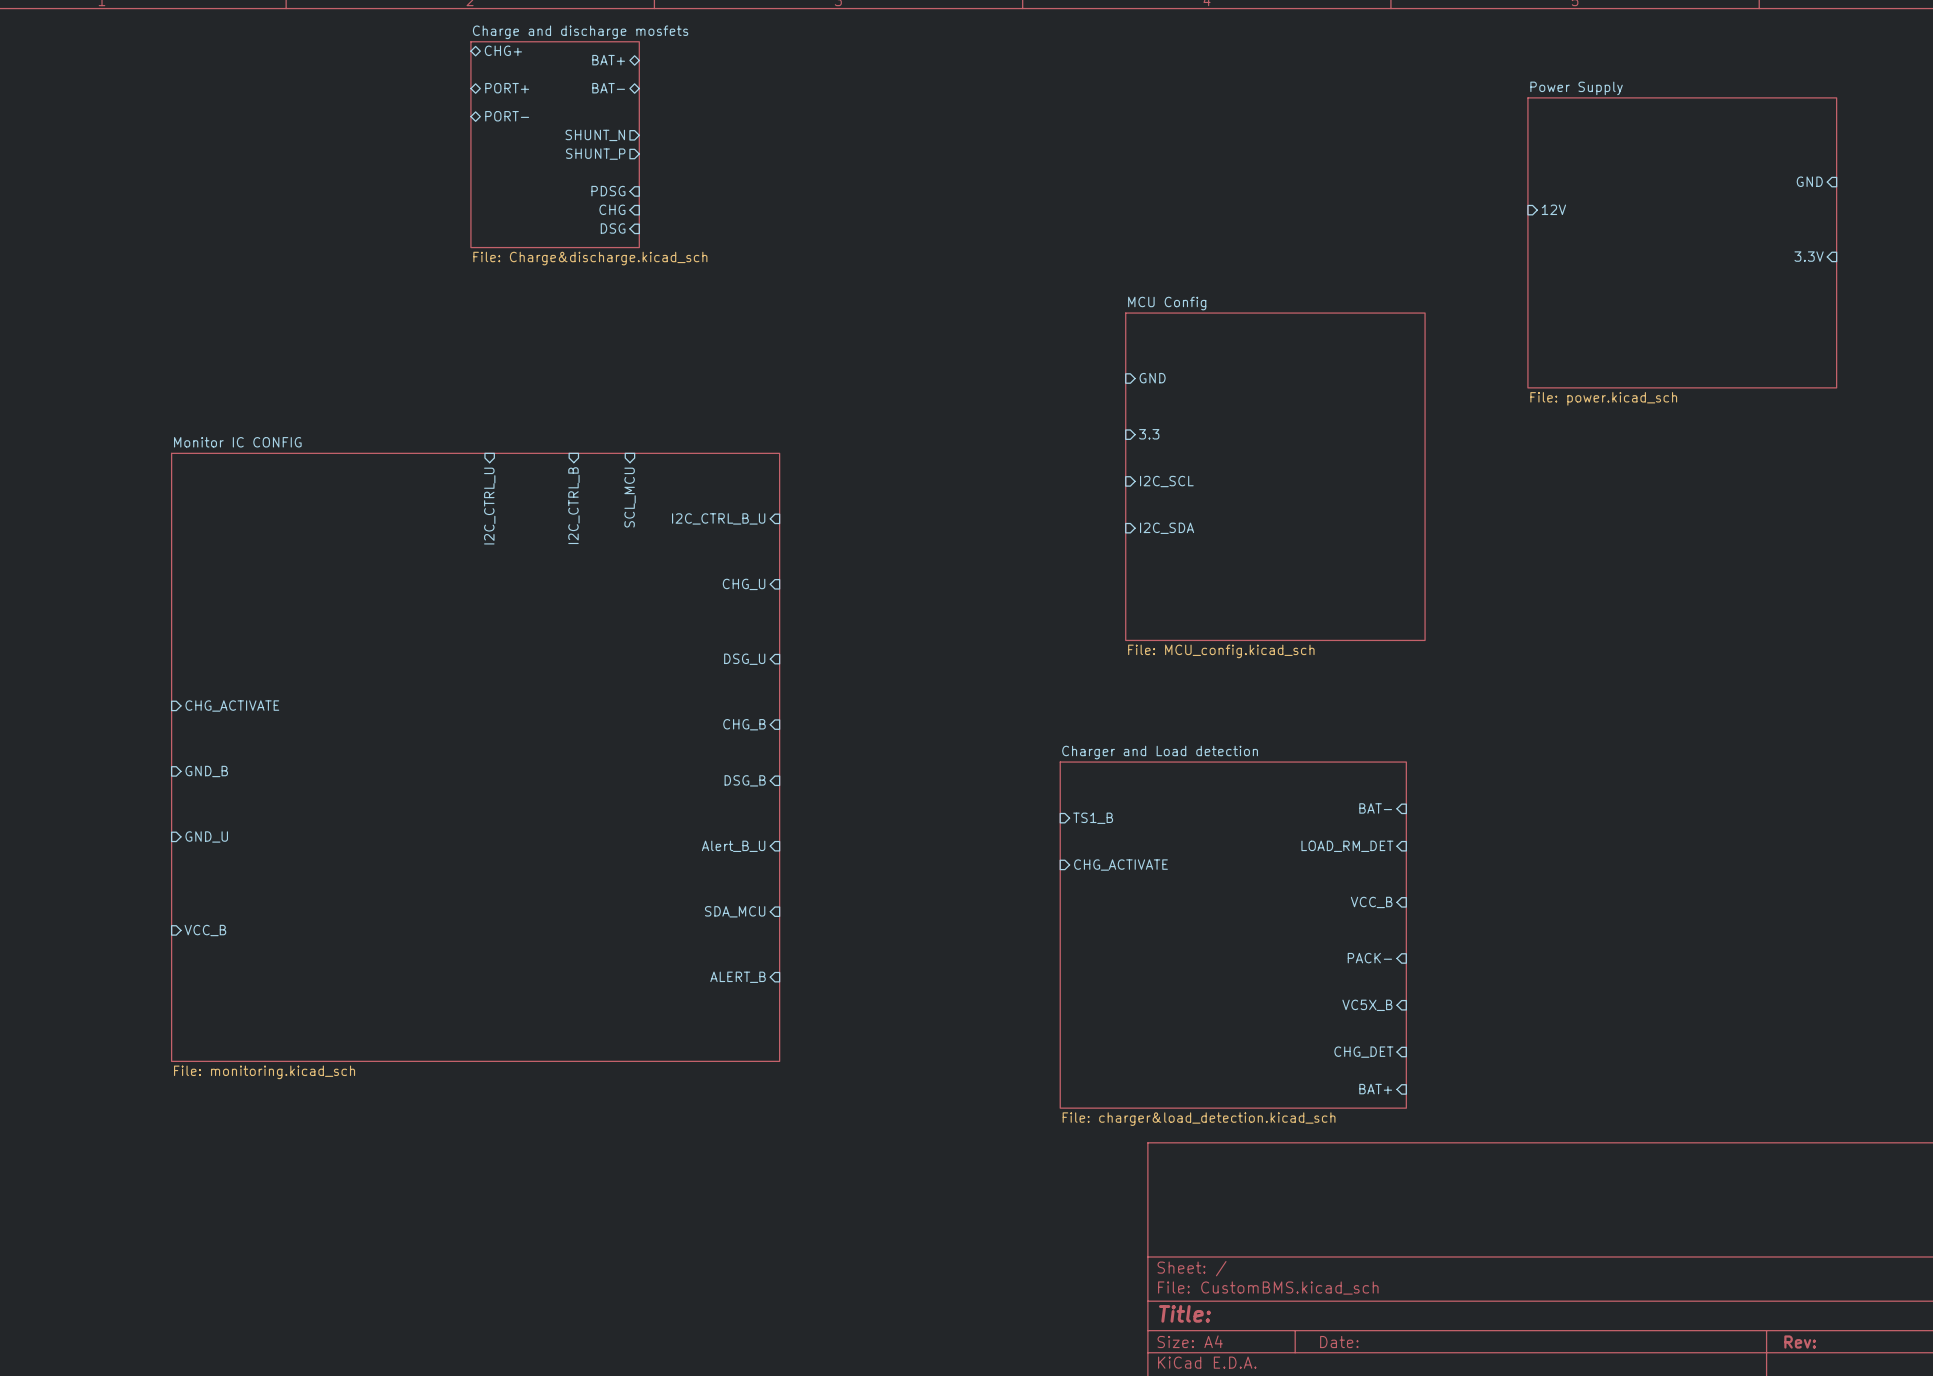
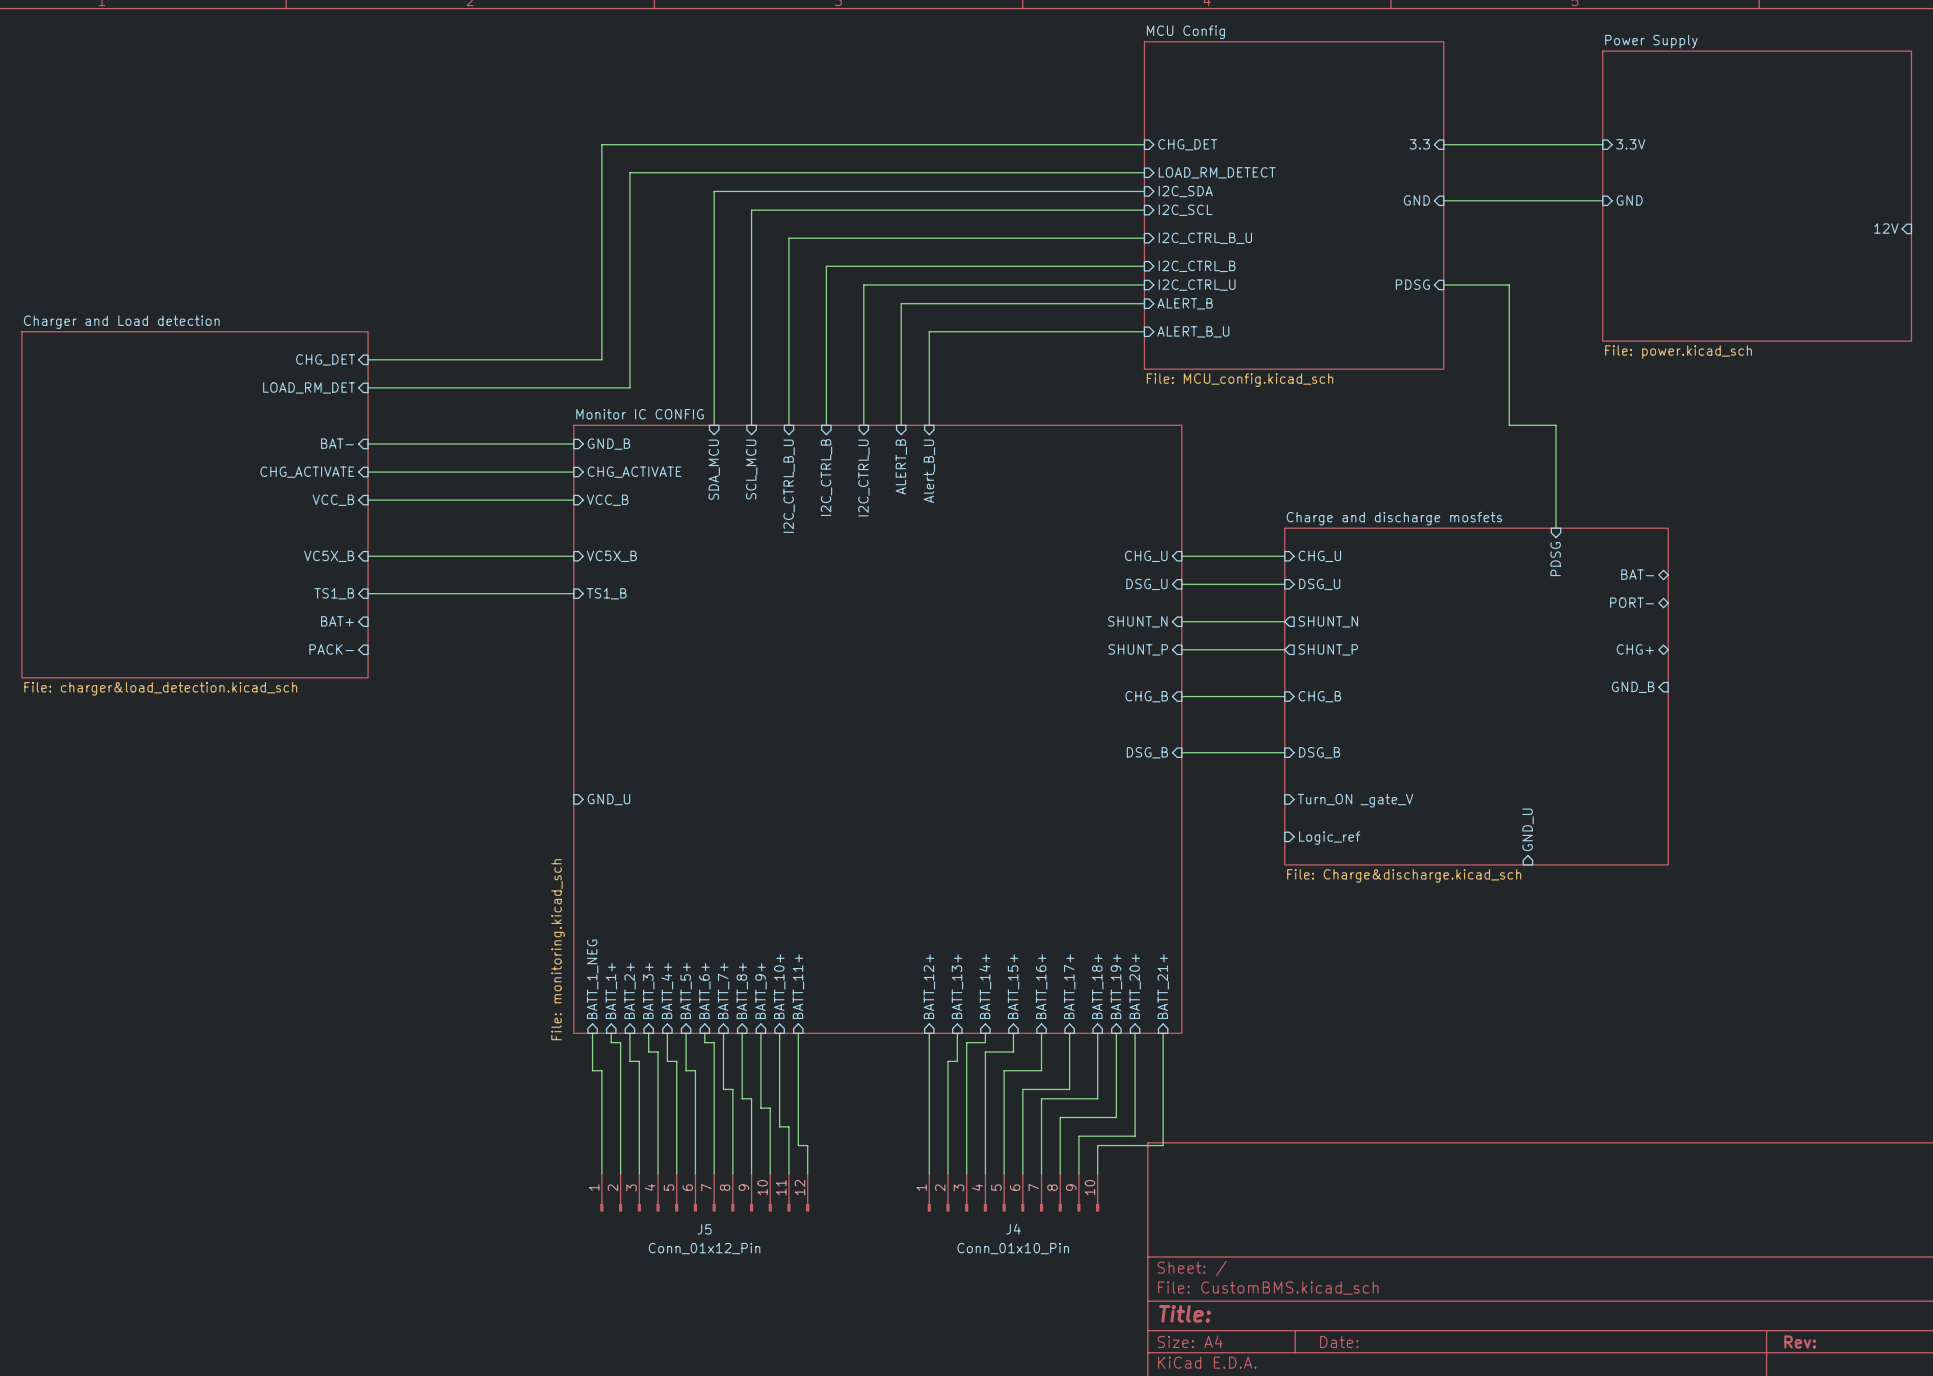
sheet pin: CHG+ (503, 50) -> none
sheet pin: BAT+ (608, 60) -> none
sheet pin: PORT+ (507, 88) -> none
sheet pin: BAT- (608, 88) -> none
sheet pin: PORT- (507, 116) -> none
sheet pin: SHUNT_N (595, 135) -> none
sheet Charge and discharge mosfets: File: Charge&discharge.kicad_sch (555, 144) -> none
wire: none -> (1144, 144) (601, 144) (601, 359) (368, 359)
sheet pin: none -> CHG_DET (1187, 144)
sheet pin: none -> 3.3 (1419, 144)
wire: none -> (1443, 144) (1602, 144)
sheet pin: none -> 3.3V (1630, 144)
sheet pin: SHUNT_P (595, 154) -> none
wire: none -> (1144, 172) (629, 172) (629, 387) (368, 387)
sheet pin: none -> LOAD_RM_DETECT (1217, 172)
sheet pin: GND (1809, 181) -> none
sheet pin: PDSG (608, 191) -> none
wire: none -> (1144, 191) (714, 191) (714, 425)
sheet pin: none -> I2C_SDA (1185, 191)
sheet pin: none -> GND (1416, 200)
wire: none -> (1443, 200) (1602, 200)
sheet pin: none -> GND (1629, 200)
sheet MCU Config: none -> File: MCU_config.kicad_sch (1294, 205)
sheet pin: CHG (612, 209) -> none
sheet pin: 12V (1553, 209) -> none
wire: none -> (1144, 210) (751, 210) (751, 425)
sheet pin: none -> I2C_SCL (1185, 210)
sheet pin: DSG (613, 228) -> none
sheet pin: none -> 12V (1886, 228)
wire: none -> (1144, 238) (788, 238) (788, 425)
sheet pin: none -> I2C_CTRL_B_U (1205, 238)
sheet Power Supply position: (1682, 242) -> (1757, 196)
sheet pin: 3.3V (1809, 256) -> none
wire: none -> (1144, 266) (826, 266) (826, 425)
sheet pin: none -> I2C_CTRL_B (1197, 266)
wire: none -> (1144, 284) (863, 284) (863, 425)
sheet pin: none -> PDSG (1412, 284)
wire: none -> (1443, 284) (1509, 284) (1509, 425) (1556, 425) (1556, 528)
sheet pin: none -> I2C_CTRL_U (1197, 285)
wire: none -> (1144, 303) (901, 303) (901, 425)
sheet pin: none -> ALERT_B (1185, 303)
wire: none -> (1144, 331) (929, 331) (929, 425)
sheet pin: none -> ALERT_B_U (1193, 331)
sheet pin: none -> CHG_DET (325, 359)
sheet pin: GND (1152, 378) -> none
sheet pin: none -> LOAD_RM_DET (309, 387)
sheet pin: 3.3 (1149, 434) -> none
sheet pin: none -> BAT- (337, 443)
wire: none -> (368, 444) (573, 444)
sheet pin: none -> GND_B (608, 444)
sheet pin: none -> ALERT_B (901, 466)
sheet pin: none -> SDA_MCU (714, 469)
sheet pin: none -> Alert_B_U (929, 471)
sheet pin: none -> CHG_ACTIVATE (307, 472)
wire: none -> (368, 472) (573, 472)
sheet pin: none -> CHG_ACTIVATE (634, 472)
sheet MCU Config: File: MCU_config.kicad_sch (1275, 476) -> none
sheet pin: none -> I2C_CTRL_B (826, 477)
sheet pin: none -> I2C_CTRL_U (863, 478)
sheet pin: I2C_SCL (1166, 481) -> none
sheet pin position: SCL_MCU (630, 497) -> SCL_MCU (751, 469)
sheet pin: none -> VCC_B (333, 500)
wire: none -> (368, 500) (573, 500)
sheet pin: none -> VCC_B (607, 500)
sheet Charger and Load detection: none -> File: charger&load_detection.kicad_sch (194, 504)
sheet pin: I2C_CTRL_B (573, 505) -> none
sheet pin: I2C_CTRL_U (489, 506) -> none
sheet pin rotation: 0° (718, 518) -> 90° counterclockwise (789, 486)
sheet pin: I2C_SDA (1167, 528) -> none
sheet pin: none -> VC5X_B (329, 556)
wire: none -> (368, 556) (573, 556)
sheet pin: none -> VC5X_B (611, 556)
sheet pin: none -> CHG_U (1146, 556)
wire: none -> (1181, 556) (1284, 556)
sheet pin: none -> CHG_U (1319, 556)
sheet pin: none -> PDSG (1555, 559)
sheet pin: none -> BAT- (1637, 574)
sheet pin: CHG_U (744, 584) -> none
sheet pin: none -> DSG_U (1146, 584)
wire: none -> (1181, 584) (1284, 584)
sheet pin: none -> DSG_U (1319, 584)
sheet pin: none -> TS1_B (334, 593)
wire: none -> (368, 593) (573, 593)
sheet pin: none -> TS1_B (606, 593)
sheet pin: none -> PORT- (1632, 602)
sheet pin: none -> BAT+ (337, 621)
sheet pin: none -> SHUNT_N (1137, 621)
wire: none -> (1181, 621) (1284, 621)
sheet pin: none -> SHUNT_N (1328, 621)
sheet pin: none -> PACK- (331, 649)
sheet pin: none -> SHUNT_P (1138, 649)
wire: none -> (1181, 649) (1284, 649)
sheet pin: none -> SHUNT_P (1328, 649)
sheet pin: none -> CHG+ (1635, 649)
sheet pin: DSG_U (744, 659) -> none
sheet pin: none -> GND_B (1633, 687)
sheet pin: none -> CHG_B (1146, 696)
wire: none -> (1181, 696) (1284, 696)
sheet pin: none -> CHG_B (1319, 696)
sheet Charge and discharge mosfets: none -> File: Charge&discharge.kicad_sch (1476, 696)
sheet pin: CHG_ACTIVATE (232, 706) -> none
sheet pin: CHG_B (744, 724) -> none
sheet Monitor IC CONFIG: none -> File: monitoring.kicad_sch (877, 729)
sheet pin: none -> DSG_B (1147, 752)
wire: none -> (1181, 752) (1284, 752)
sheet pin: none -> DSG_B (1319, 752)
sheet Monitor IC CONFIG: File: monitoring.kicad_sch (475, 757) -> none
sheet pin: GND_B (206, 771) -> none
sheet pin: DSG_B (745, 780) -> none
sheet pin: none -> GND_U (608, 799)
sheet pin: none -> Turn_ON _gate_V (1355, 800)
sheet pin: BAT- (1375, 808) -> none
sheet pin: TS1_B (1093, 818) -> none
sheet pin: none -> GND_U (1528, 829)
sheet pin: GND_U (206, 836) -> none
sheet pin: none -> Logic_ref (1329, 838)
sheet pin: Alert_B_U (733, 846) -> none
sheet pin: LOAD_RM_DET (1347, 846) -> none
sheet pin: CHG_ACTIVATE (1120, 865) -> none
sheet pin: VCC_B (1371, 902) -> none
sheet pin: SDA_MCU (735, 911) -> none
sheet pin: VCC_B (205, 930) -> none
sheet Charger and Load detection: File: charger&load_detection.kicad_sch (1233, 935) -> none
sheet pin: PACK- (1369, 958) -> none
sheet pin: ALERT_B (738, 977) -> none
sheet pin: none -> BATT_1_NEG (592, 979)
sheet pin: none -> BATT_10+ (779, 986)
sheet pin: none -> BATT_11+ (798, 986)
sheet pin: none -> BATT_12+ (929, 986)
sheet pin: none -> BATT_13+ (957, 986)
sheet pin: none -> BATT_14+ (985, 986)
sheet pin: none -> BATT_15+ (1013, 986)
sheet pin: none -> BATT_16+ (1041, 986)
sheet pin: none -> BATT_17+ (1069, 986)
sheet pin: none -> BATT_18+ (1097, 986)
sheet pin: none -> BATT_19+ (1116, 986)
sheet pin: none -> BATT_20+ (1135, 986)
sheet pin: none -> BATT_21+ (1163, 986)
sheet pin: none -> BATT_1+ (611, 991)
sheet pin: none -> BATT_2+ (630, 991)
sheet pin: none -> BATT_3+ (648, 991)
sheet pin: none -> BATT_4+ (667, 991)
sheet pin: none -> BATT_5+ (686, 991)
sheet pin: none -> BATT_6+ (704, 991)
sheet pin: none -> BATT_7+ (723, 991)
sheet pin: none -> BATT_8+ (742, 991)
sheet pin: none -> BATT_9+ (761, 991)
sheet pin: VC5X_B (1367, 1005) -> none
wire: none -> (592, 1033) (592, 1070) (601, 1070) (601, 1173)
wire: none -> (611, 1033) (611, 1042) (620, 1042) (620, 1173)
wire: none -> (629, 1033) (629, 1061) (639, 1061) (639, 1173)
wire: none -> (648, 1033) (648, 1052) (658, 1052) (658, 1173)
wire: none -> (667, 1033) (667, 1061) (676, 1061) (676, 1173)
wire: none -> (686, 1033) (686, 1070) (695, 1070) (695, 1173)
wire: none -> (704, 1033) (704, 1042) (714, 1042) (714, 1173)
wire: none -> (723, 1033) (723, 1089) (732, 1089) (732, 1173)
wire: none -> (742, 1033) (742, 1098) (751, 1098) (751, 1173)
wire: none -> (760, 1033) (760, 1108) (770, 1108) (770, 1173)
wire: none -> (779, 1033) (779, 1126) (788, 1126) (788, 1173)
wire: none -> (798, 1033) (798, 1145) (807, 1145) (807, 1173)
wire: none -> (929, 1033) (929, 1173)
wire: none -> (957, 1033) (957, 1061) (947, 1061) (947, 1173)
wire: none -> (985, 1033) (985, 1042) (966, 1042) (966, 1173)
wire: none -> (1013, 1033) (1013, 1052) (985, 1052) (985, 1173)
wire: none -> (1041, 1033) (1041, 1070) (1004, 1070) (1004, 1173)
wire: none -> (1069, 1033) (1069, 1089) (1022, 1089) (1022, 1173)
wire: none -> (1097, 1033) (1097, 1098) (1041, 1098) (1041, 1173)
wire: none -> (1116, 1033) (1116, 1117) (1060, 1117) (1060, 1173)
wire: none -> (1135, 1033) (1135, 1136) (1078, 1136) (1078, 1173)
wire: none -> (1163, 1033) (1163, 1145) (1097, 1145) (1097, 1173)
sheet pin: CHG_DET (1363, 1052) -> none
sheet pin: BAT+ (1375, 1089) -> none
J5: none -> Conn_01x12_Pin (704, 1192)
J4: none -> Conn_01x10_Pin (1013, 1192)

